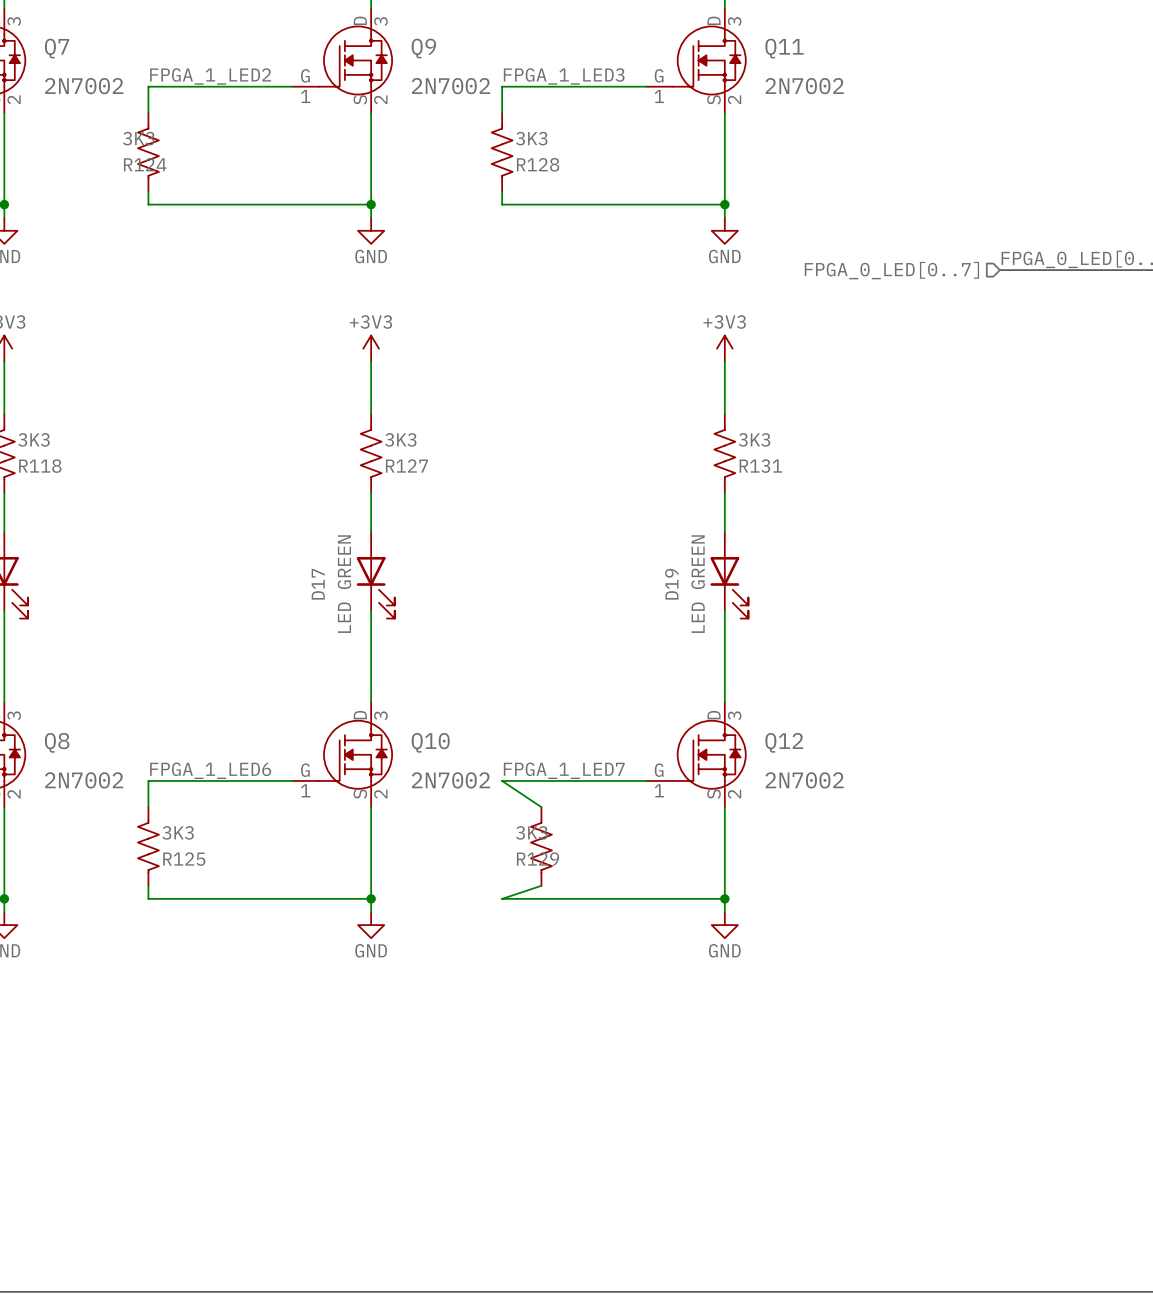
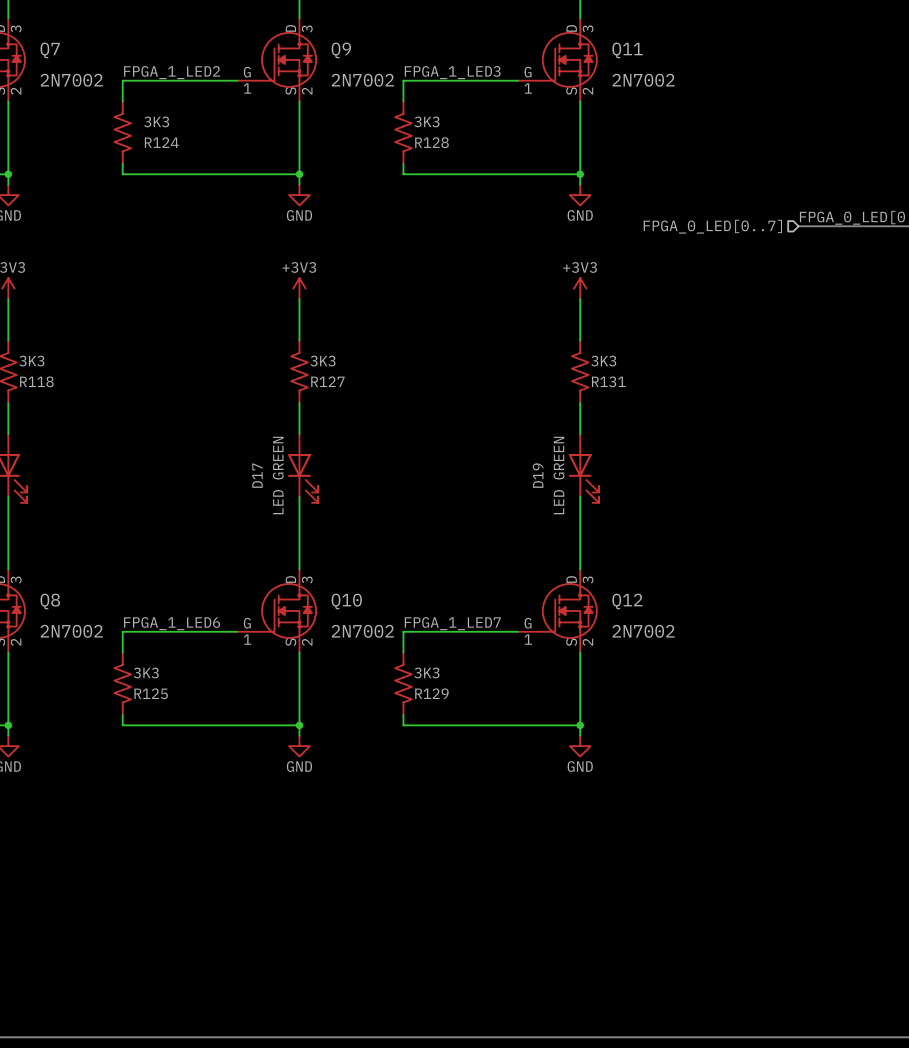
R124 value position: 3K3 (138, 138) -> 3K3 (156, 121)
R124 name position: R124 (145, 164) -> R124 (161, 142)
wire: (502, 780) (541, 807) -> (403, 631) (403, 652)
R129 position: (541, 846) -> (403, 683)
wire: (541, 885) (502, 898) -> (403, 714) (403, 725)

